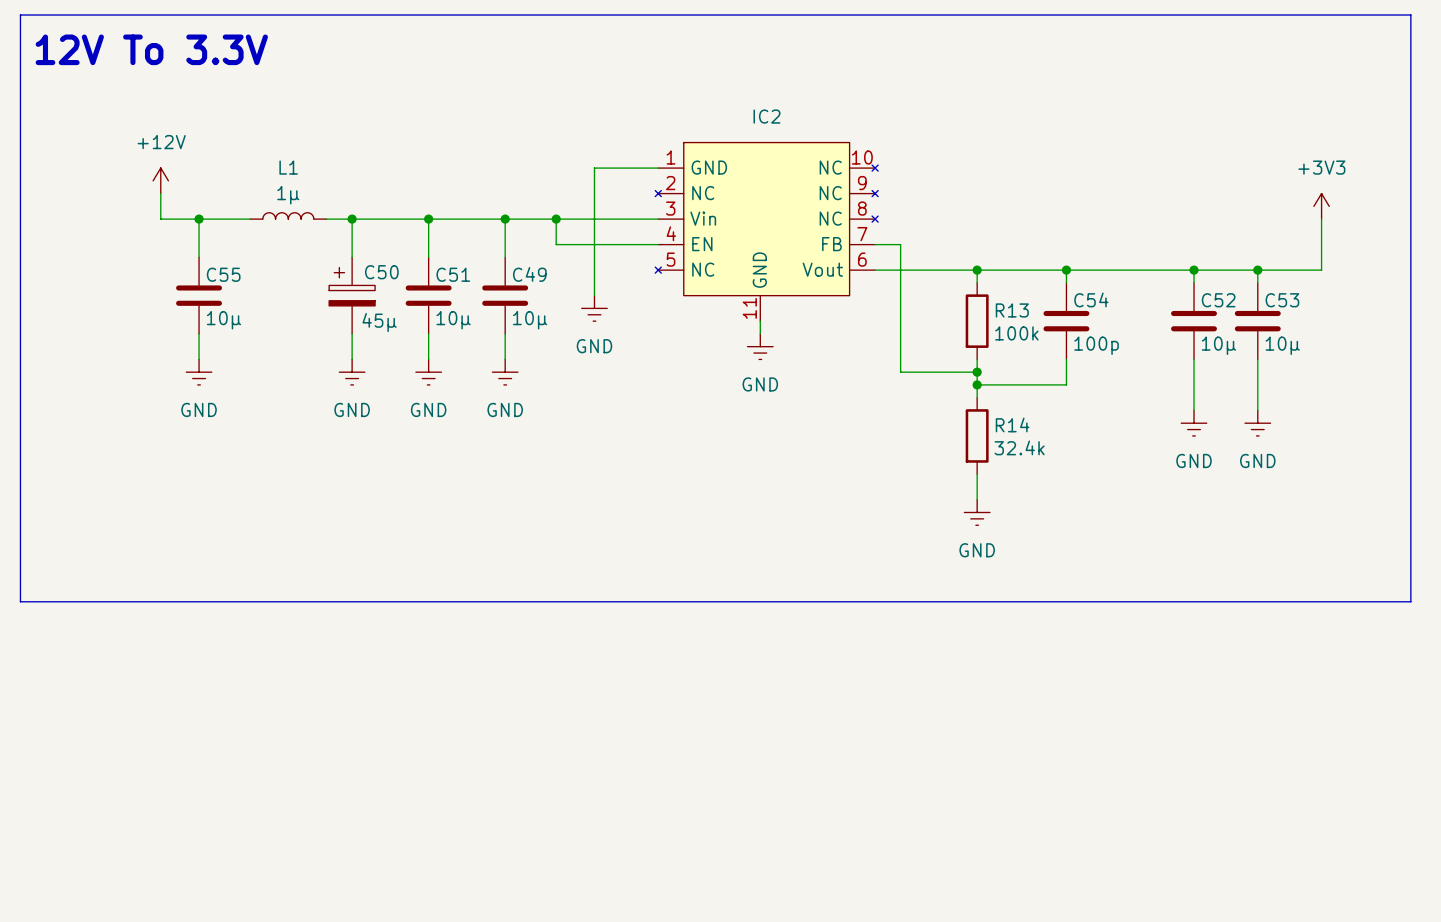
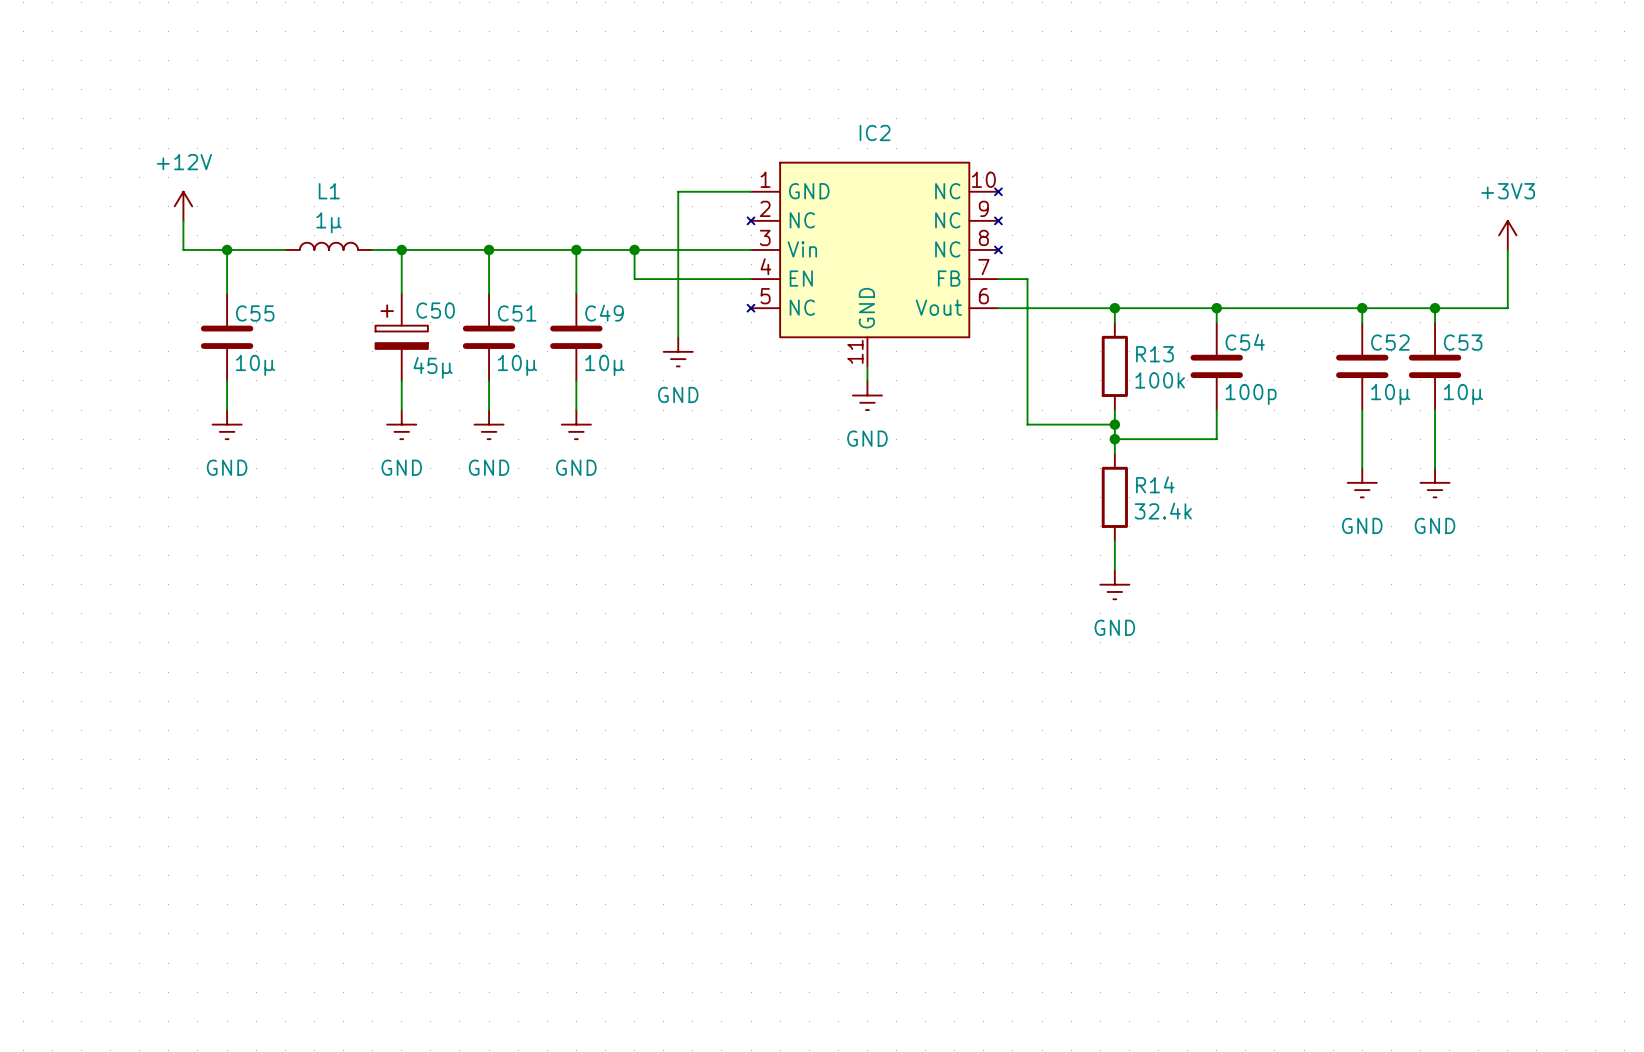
line: (20, 15) (1410, 15) (1410, 601) (20, 601) (20, 15) -> none
text: 12V To 3.3V (151, 49) -> none

